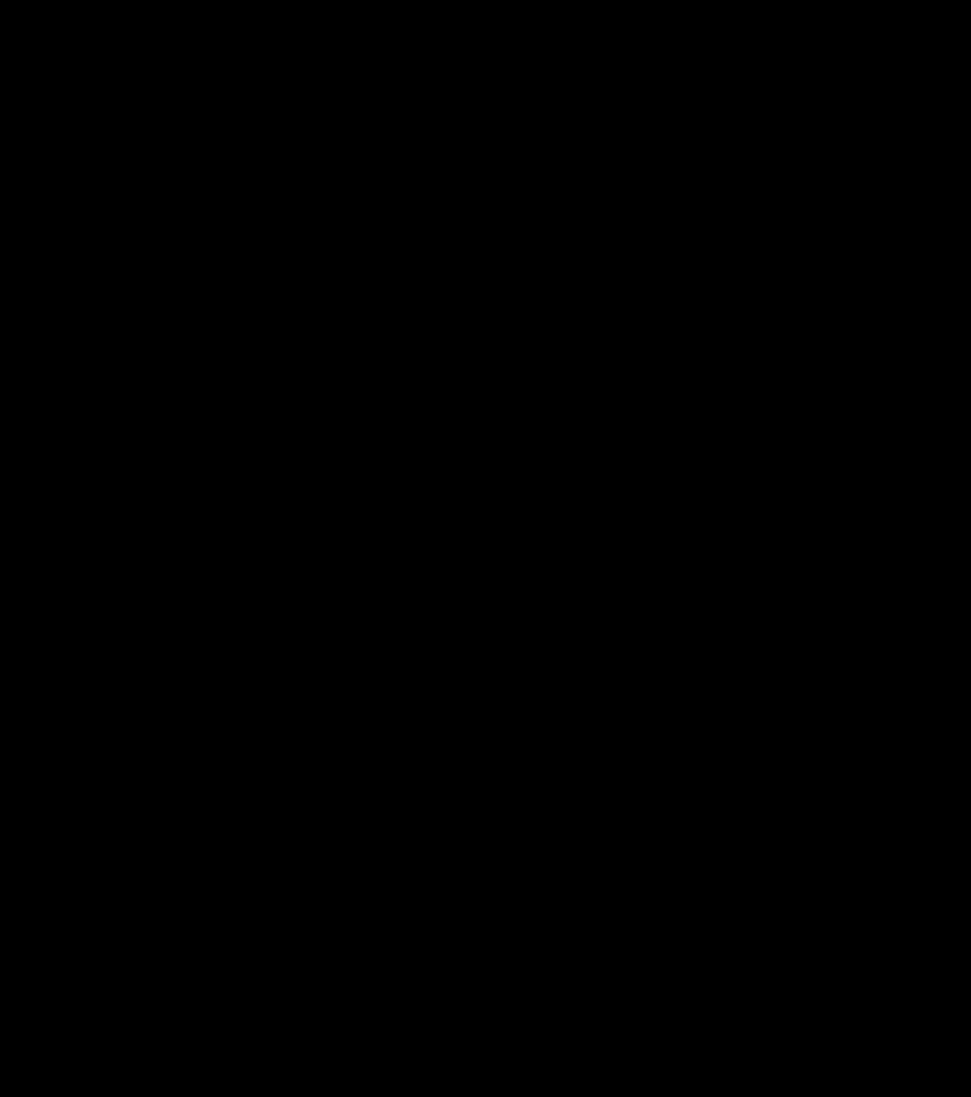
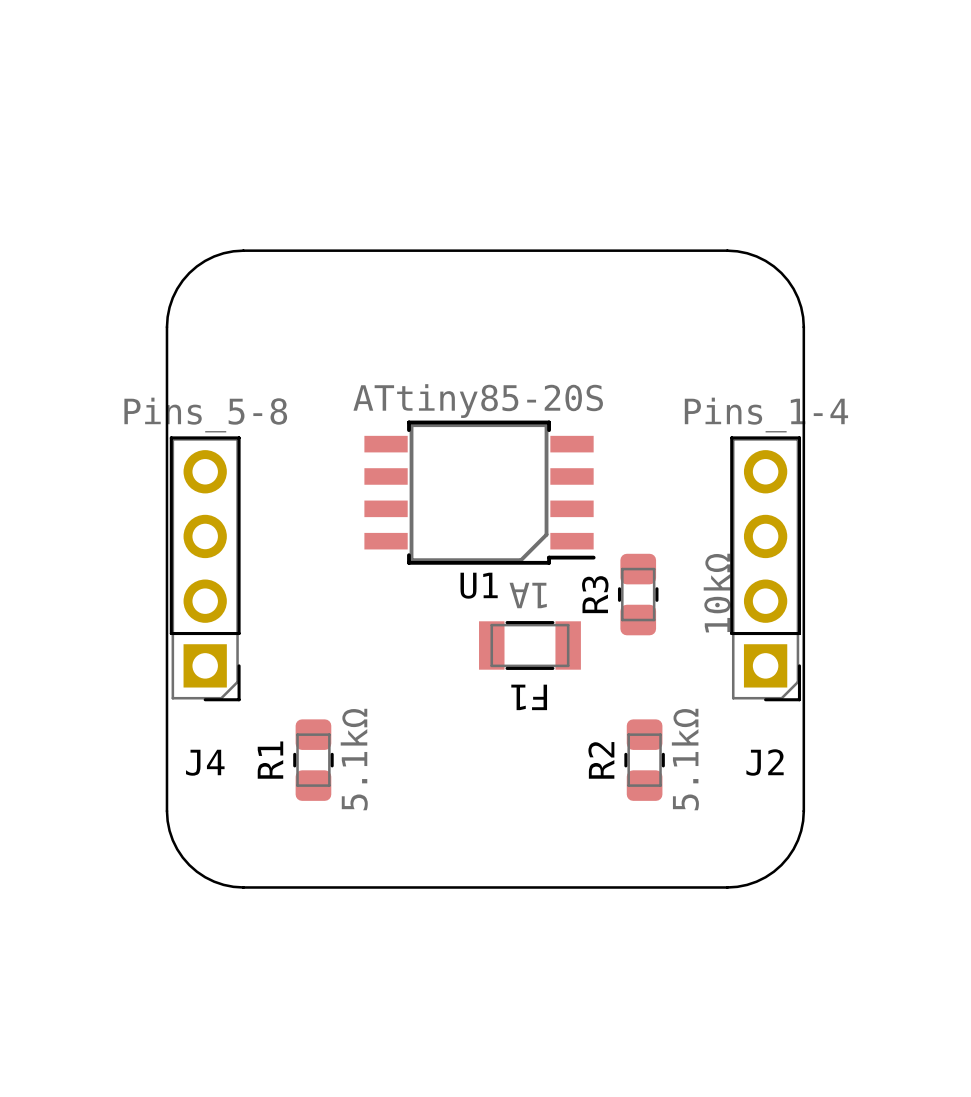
board edge: none -> (243, 250) (727, 250) (747, 253) (765, 260) (788, 280) (797, 297) (803, 327) (803, 811) (801, 830) (793, 849) (773, 871) (747, 884) (727, 887) (243, 887) (214, 881) (196, 871) (182, 857) (172, 840) (166, 811) (167, 317) (172, 297) (189, 273) (214, 256) (243, 250)
U1: none -> ATtiny85-20S (479, 492)
J4: none -> Pins_5-8 (205, 568)
J2: none -> Pins_1-4 (765, 568)
R3: none -> 10kΩ (638, 594)
F1: none -> 1A (529, 645)
R1: none -> 5.1kΩ (313, 760)
R2: none -> 5.1kΩ (644, 760)

